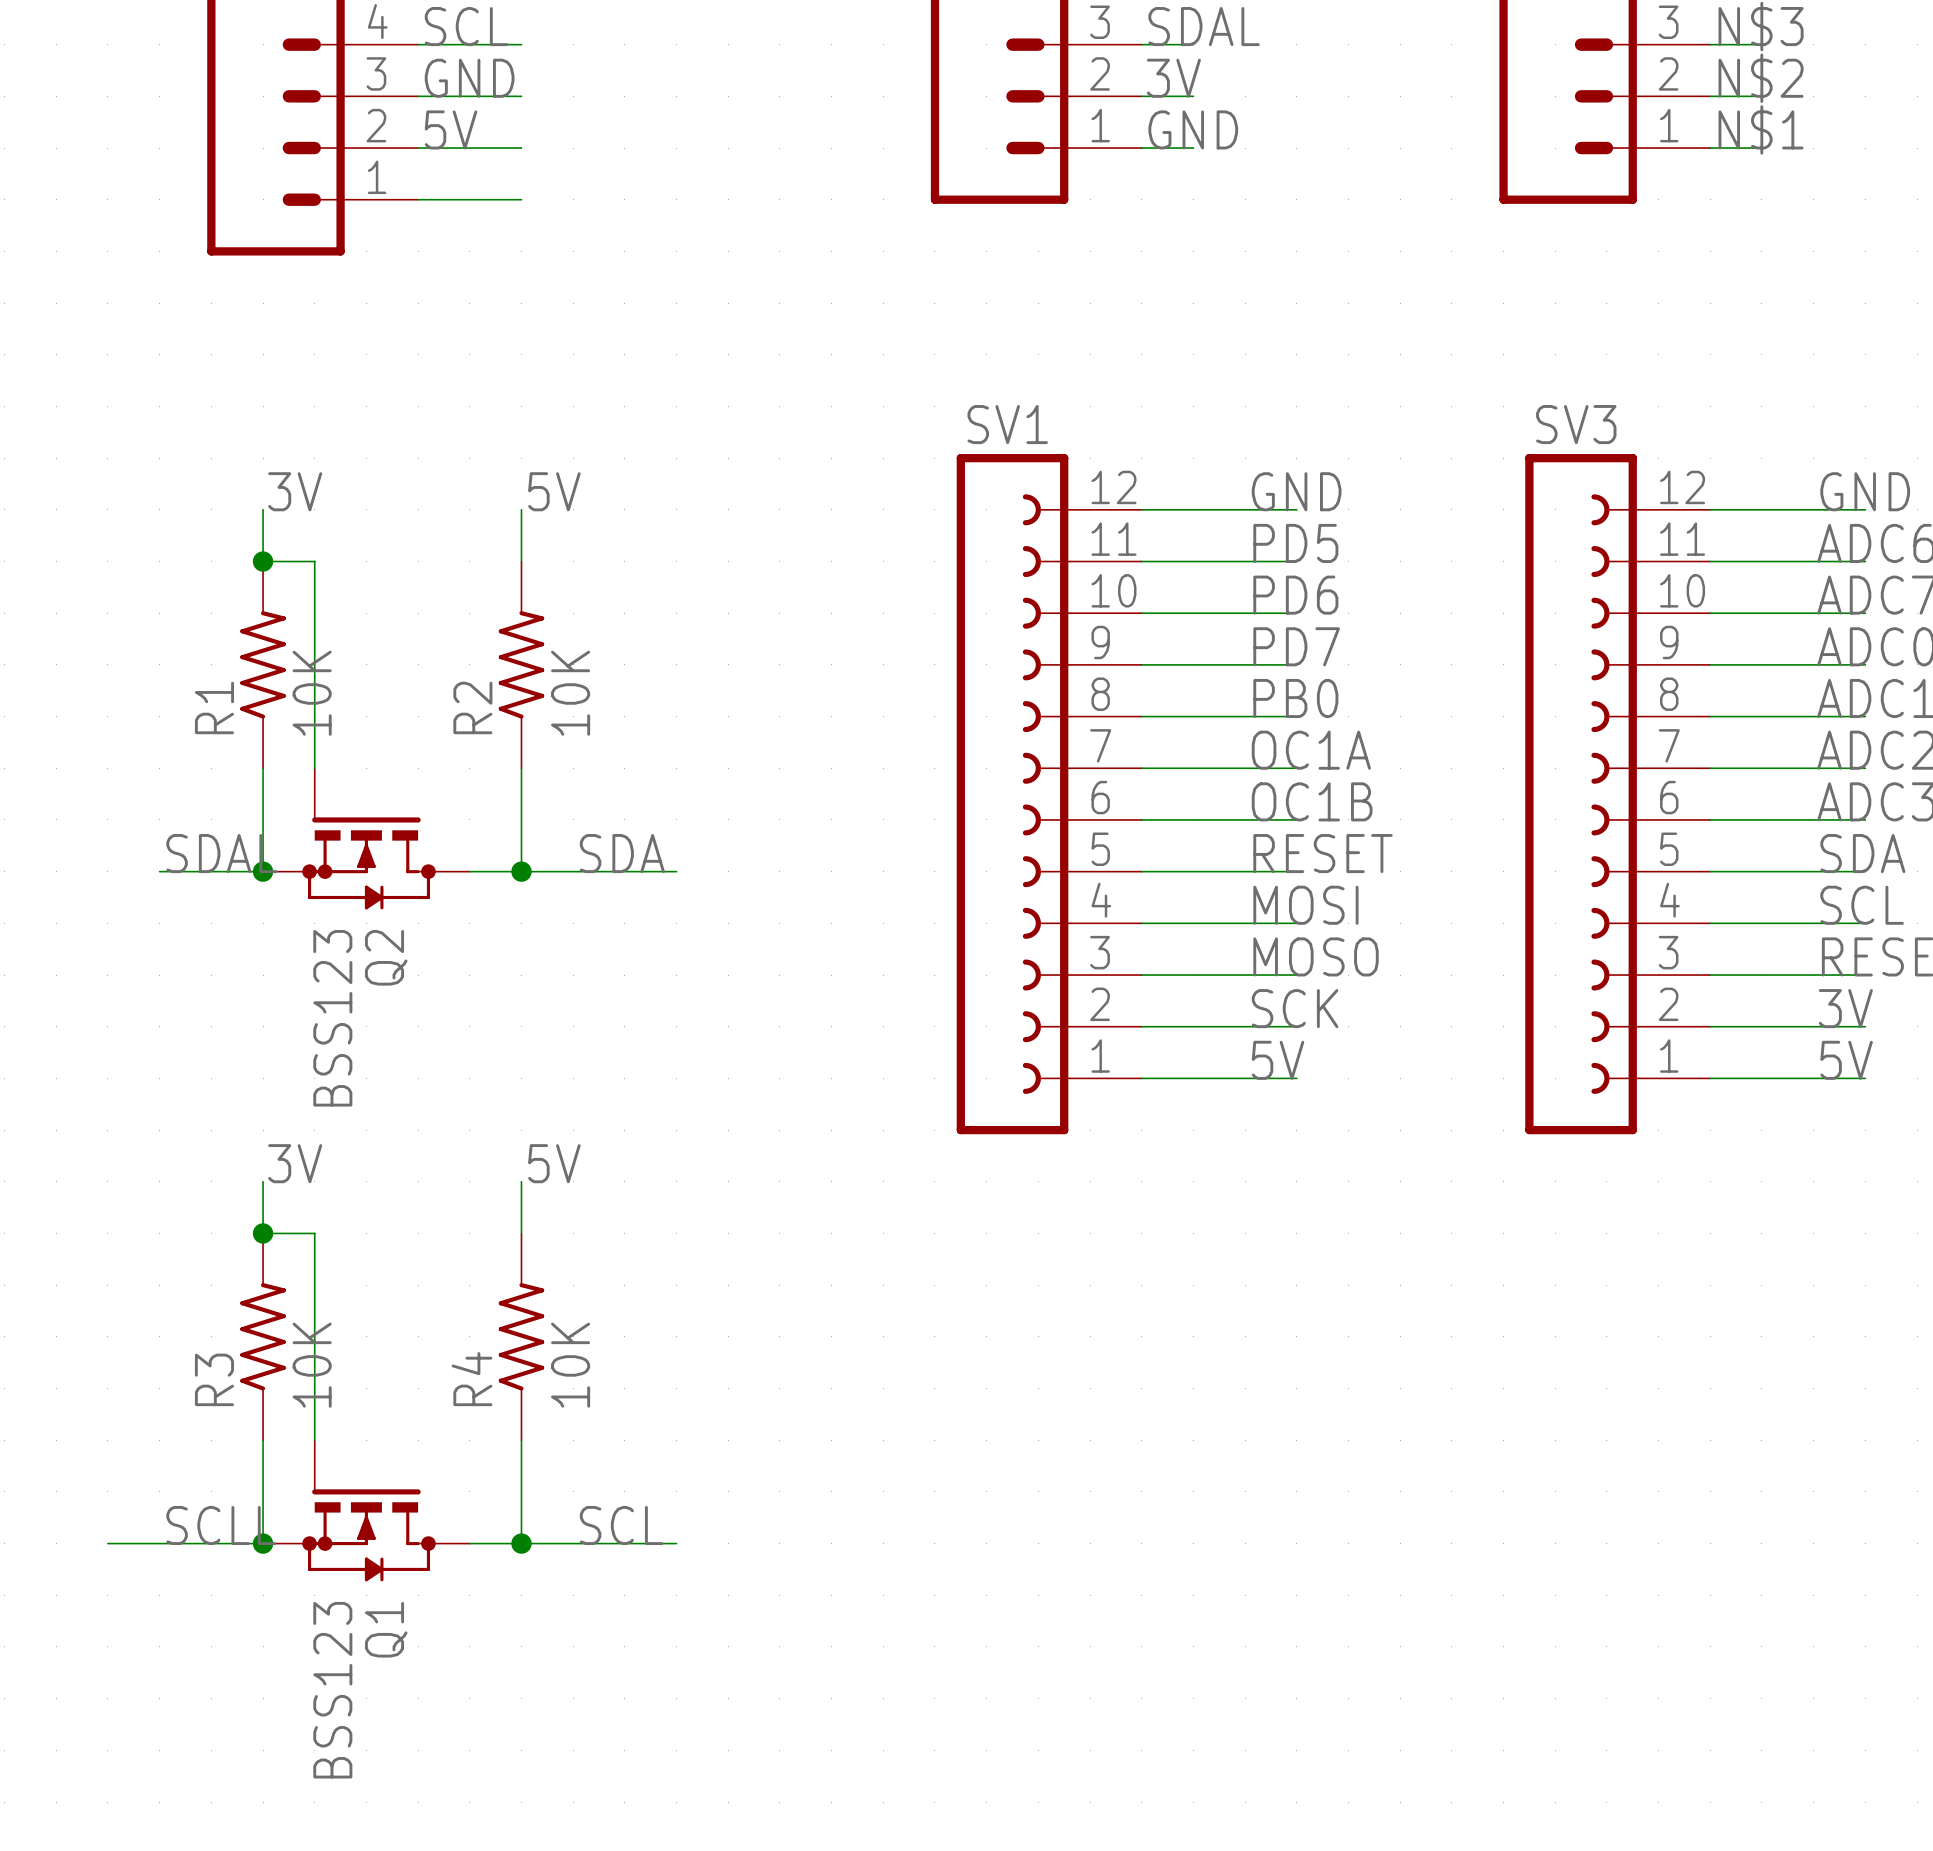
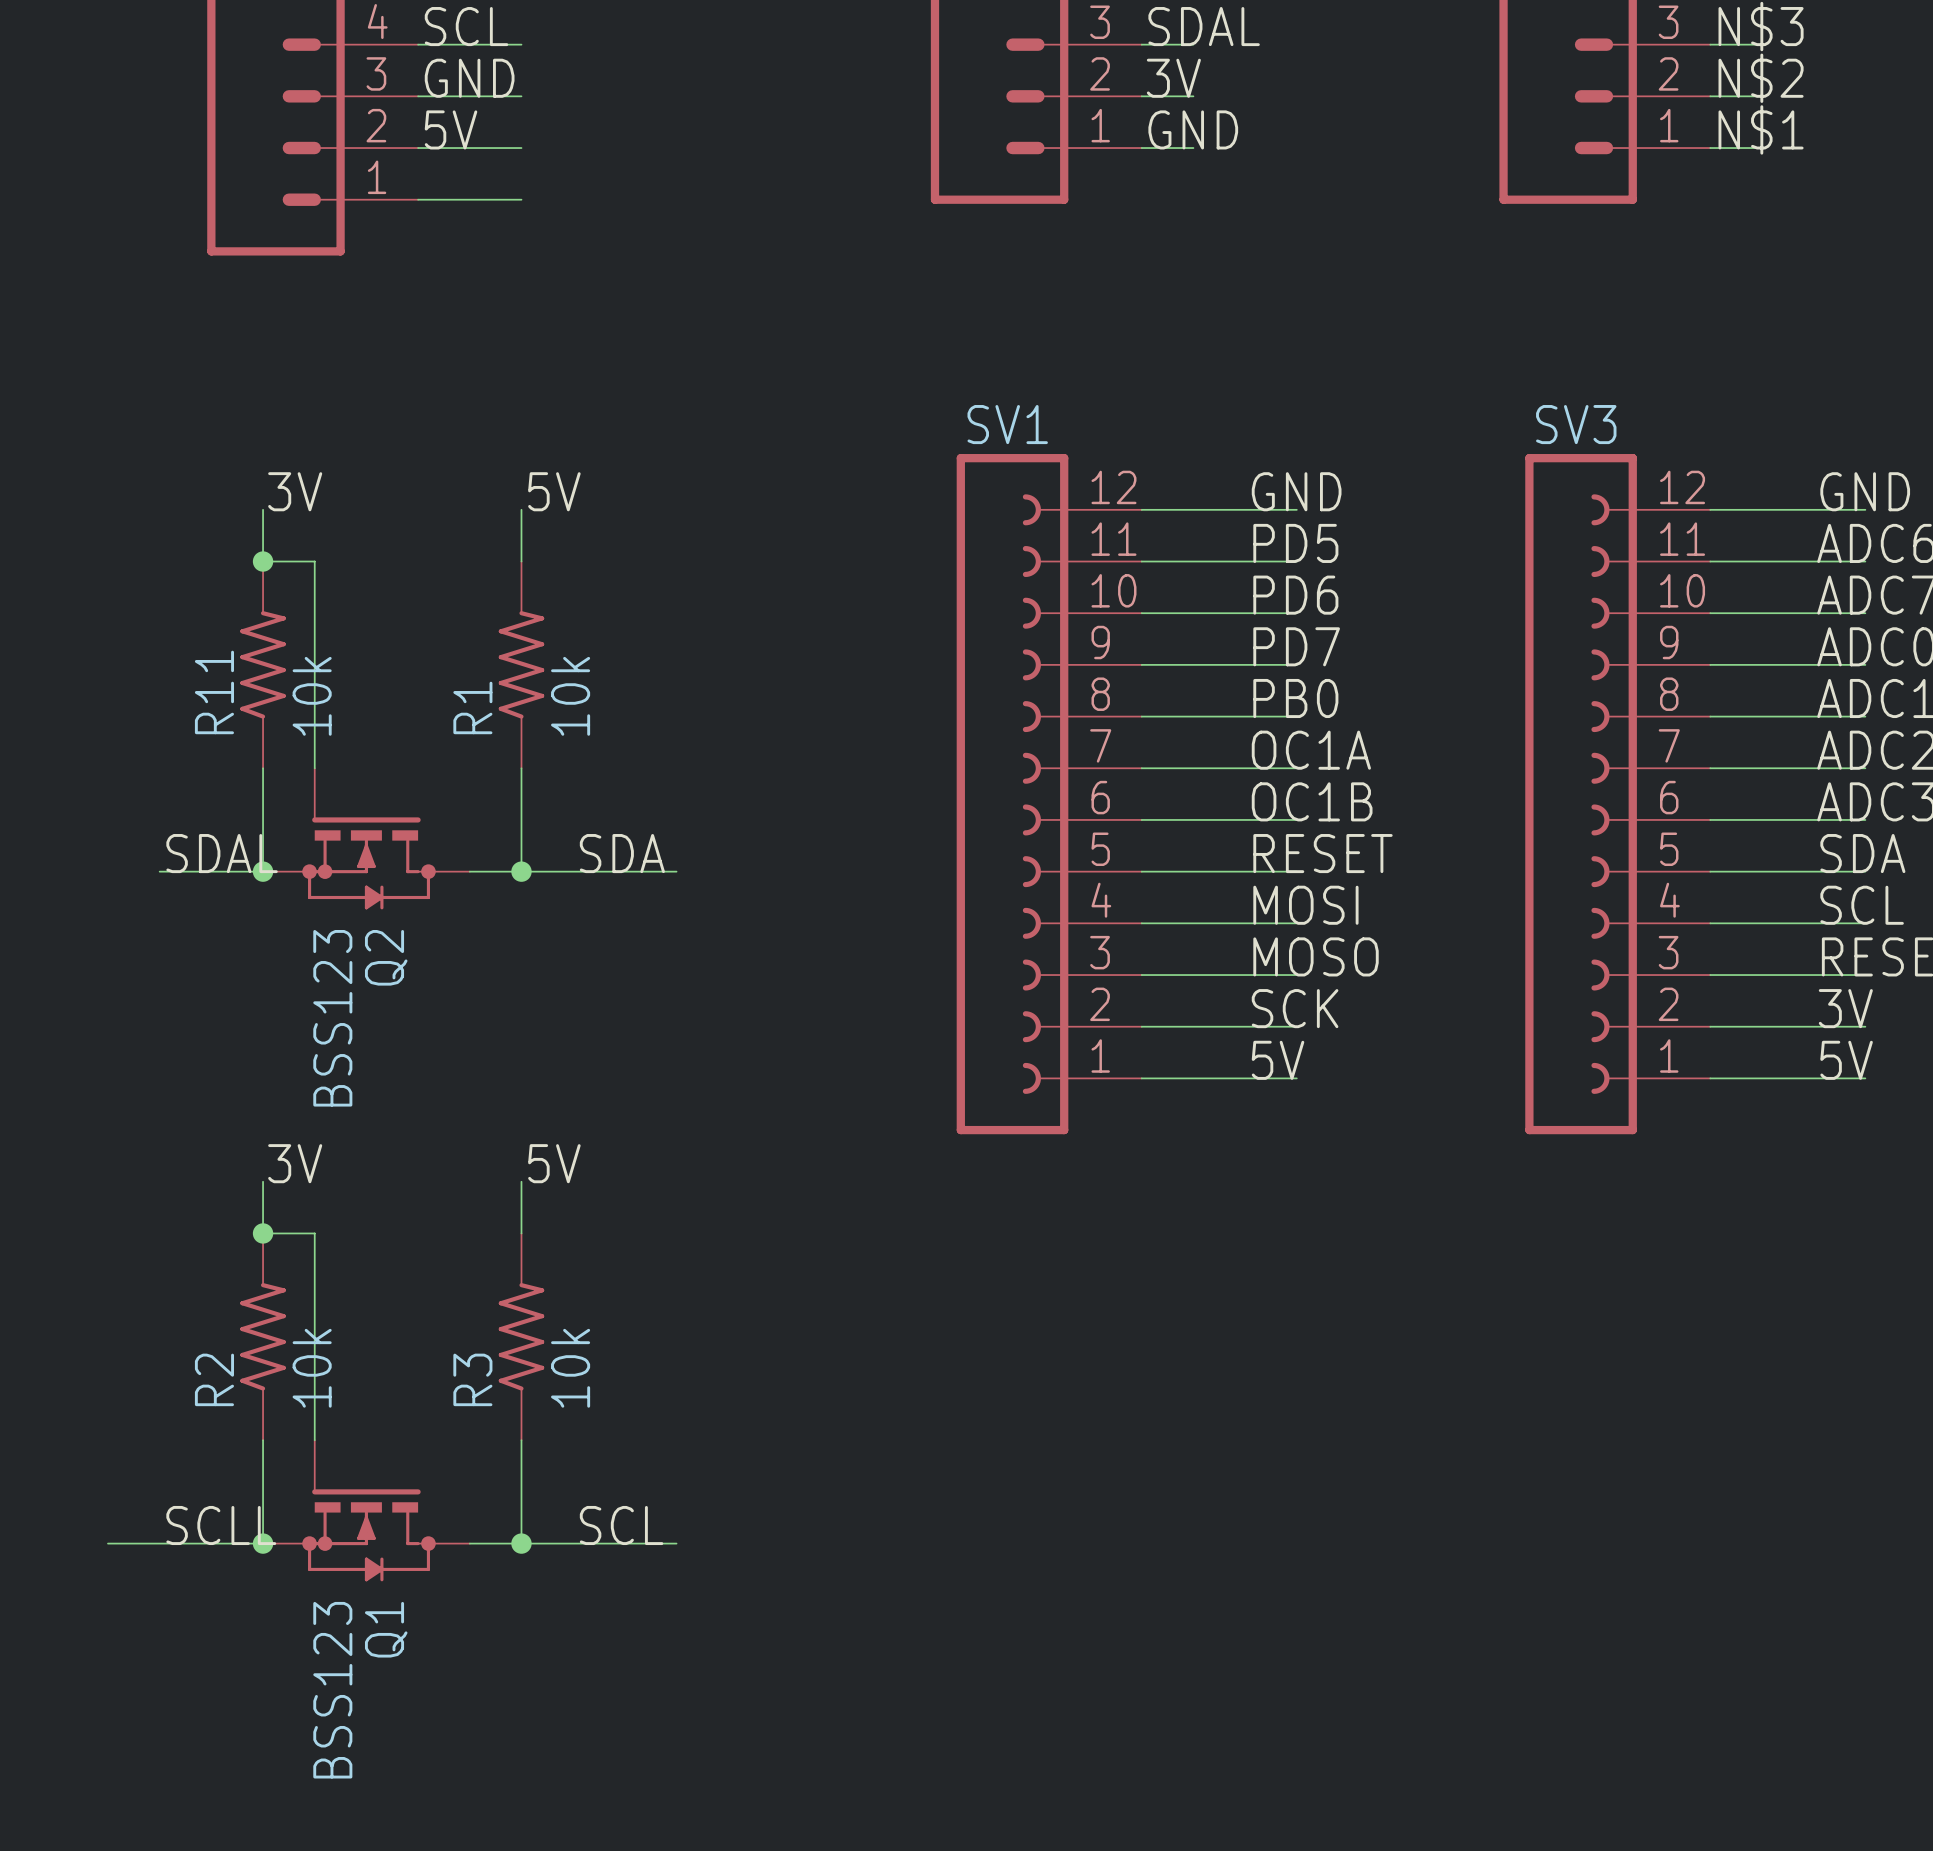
R1 value: 10K (312, 693) -> 10k (312, 696)
R2 value: 10K (570, 693) -> 10k (570, 696)
R1 name: R1 (214, 707) -> R11 (214, 692)
R2 name: R2 (472, 707) -> R1 (472, 707)
R3 value: 10K (312, 1365) -> 10k (312, 1368)
R4 value: 10K (570, 1365) -> 10k (570, 1368)
R3 name: R3 (214, 1379) -> R2 (214, 1379)
R4 name: R4 (472, 1379) -> R3 (472, 1379)

